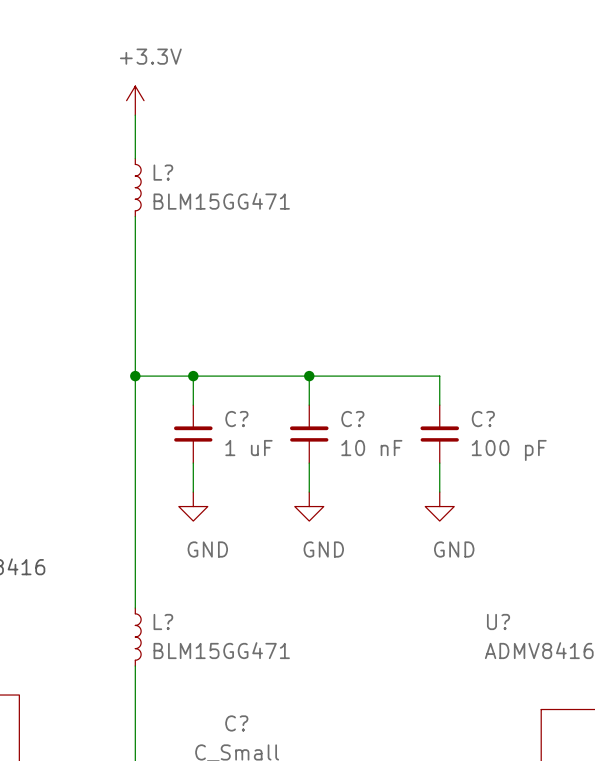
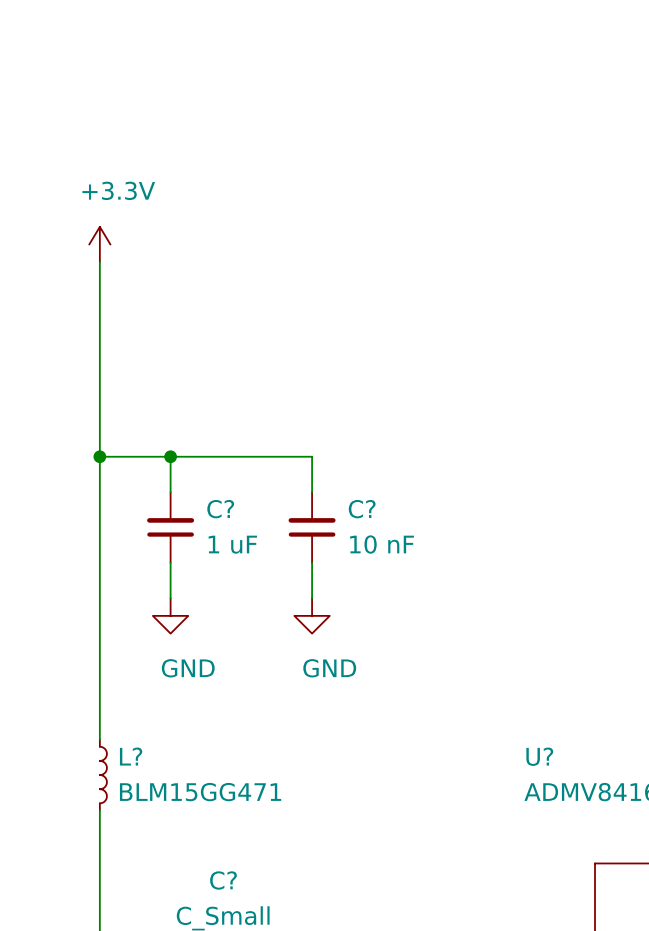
power symbol position: +3.3V (135, 100) -> +3.3V (99, 244)
wire: (135, 115) (135, 158) -> none
L?: BLM15GG471 (138, 187) -> none
wire: (309, 376) (439, 376) (439, 405) -> none
junction: (309, 376) -> none
C?: 100 pF (439, 434) -> none
wire: (439, 463) (439, 492) -> none
power symbol: GND (439, 506) -> none

